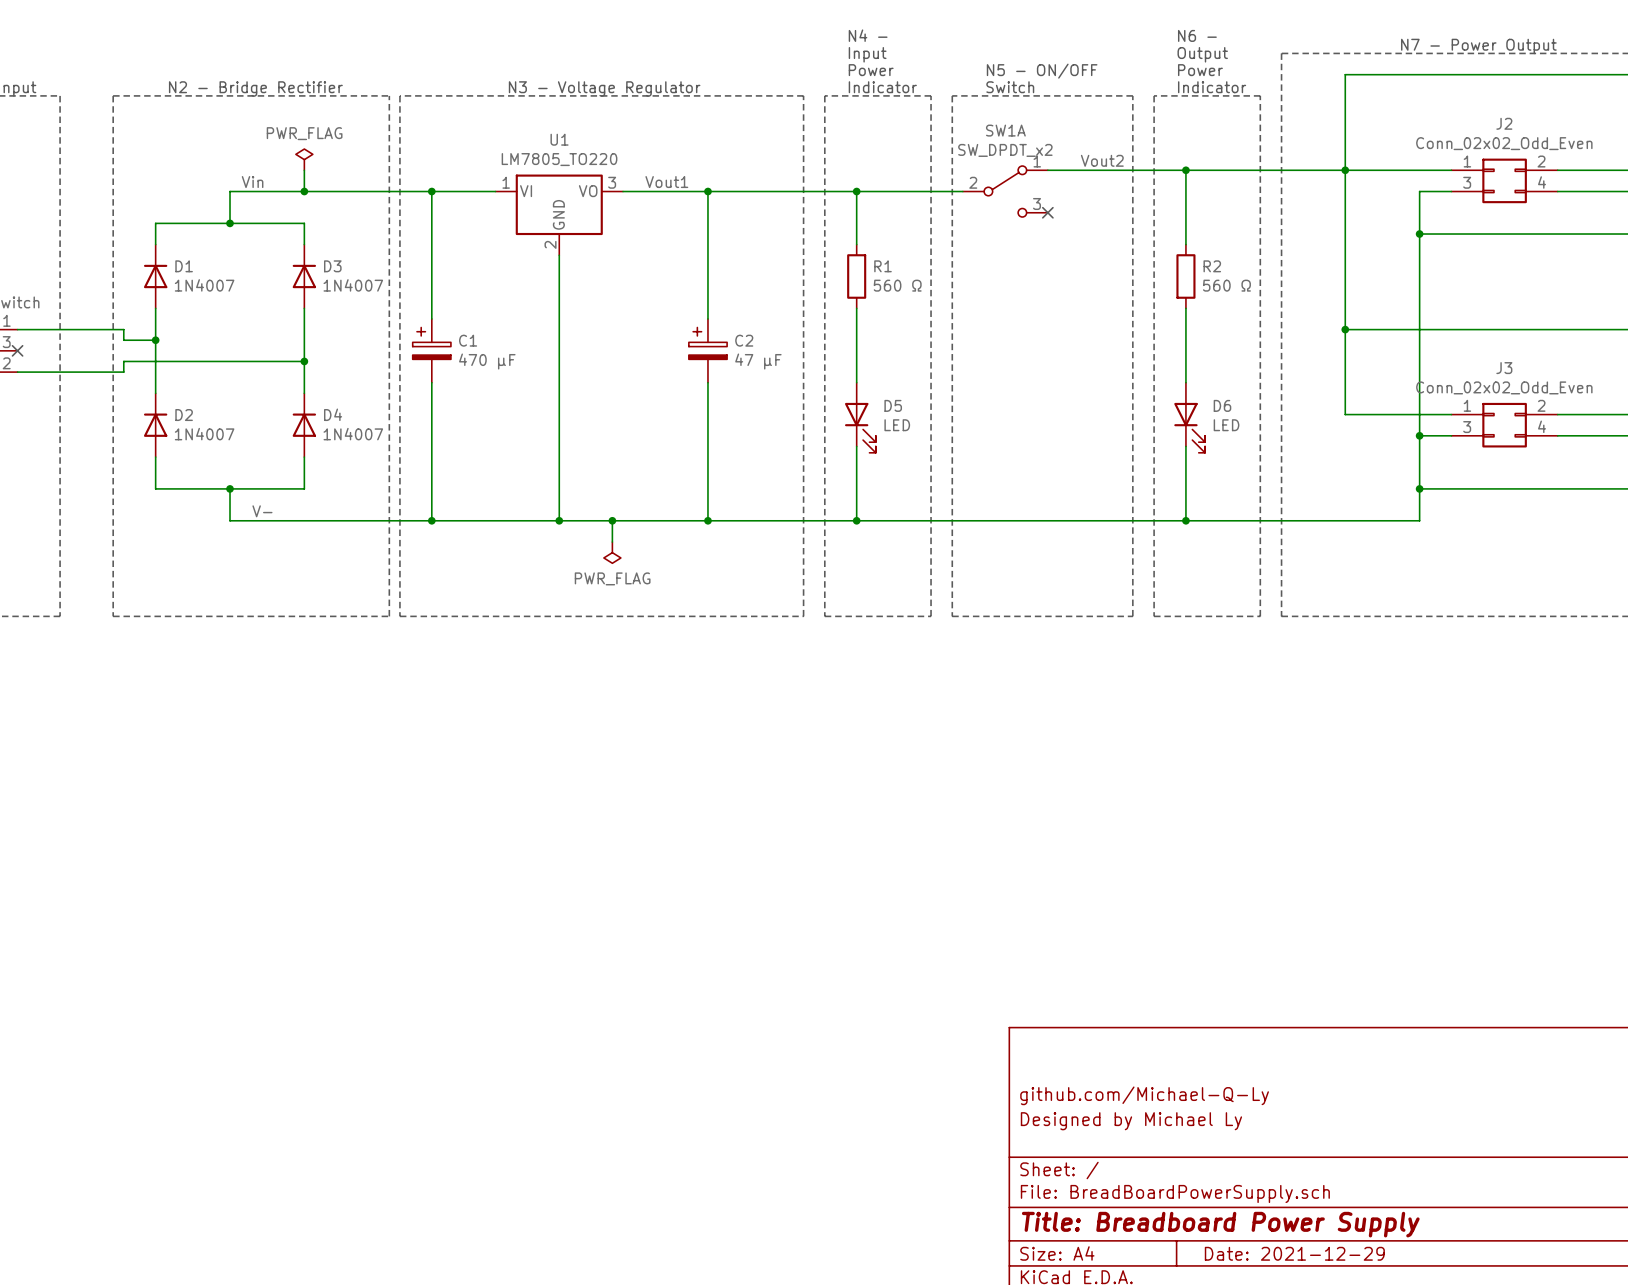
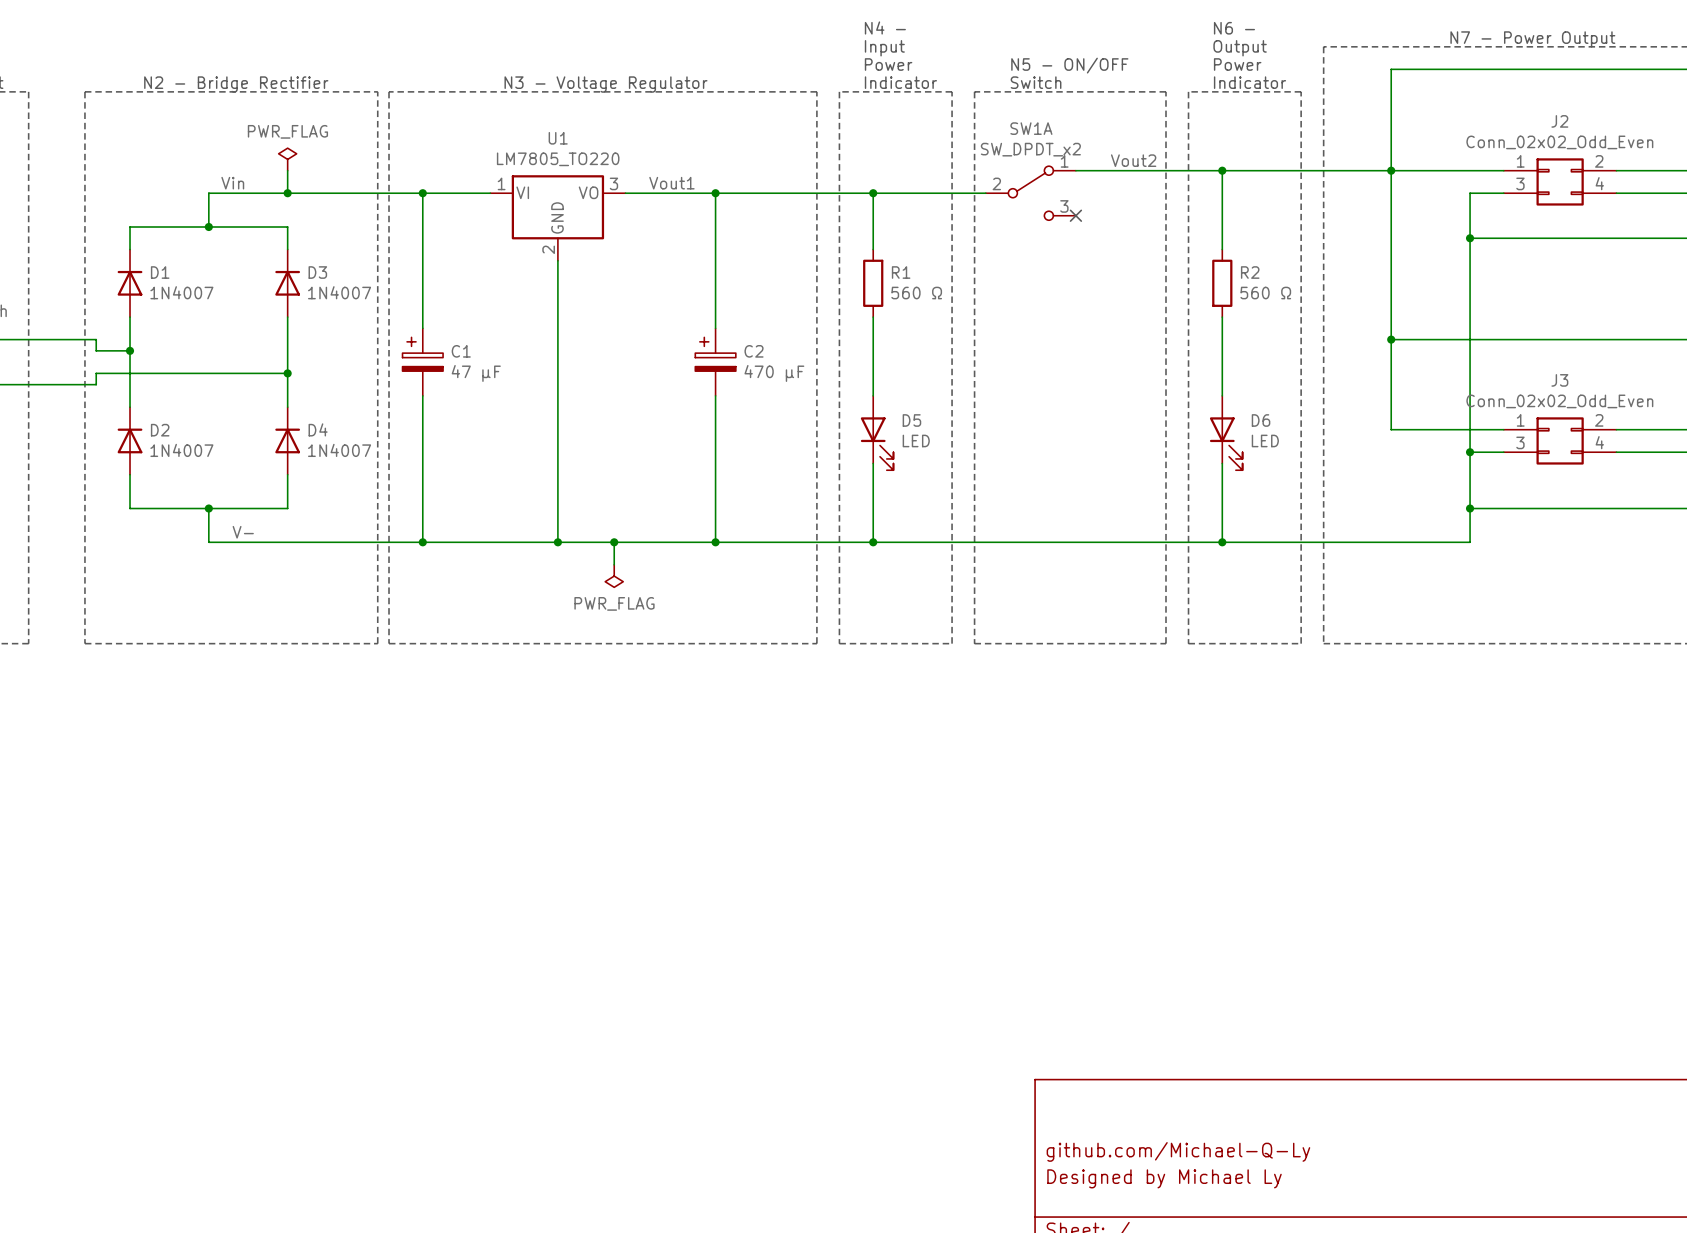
C1 value: 470 μF (487, 361) -> 47 μF (476, 373)
C2 value: 47 μF (758, 361) -> 470 μF (774, 373)

